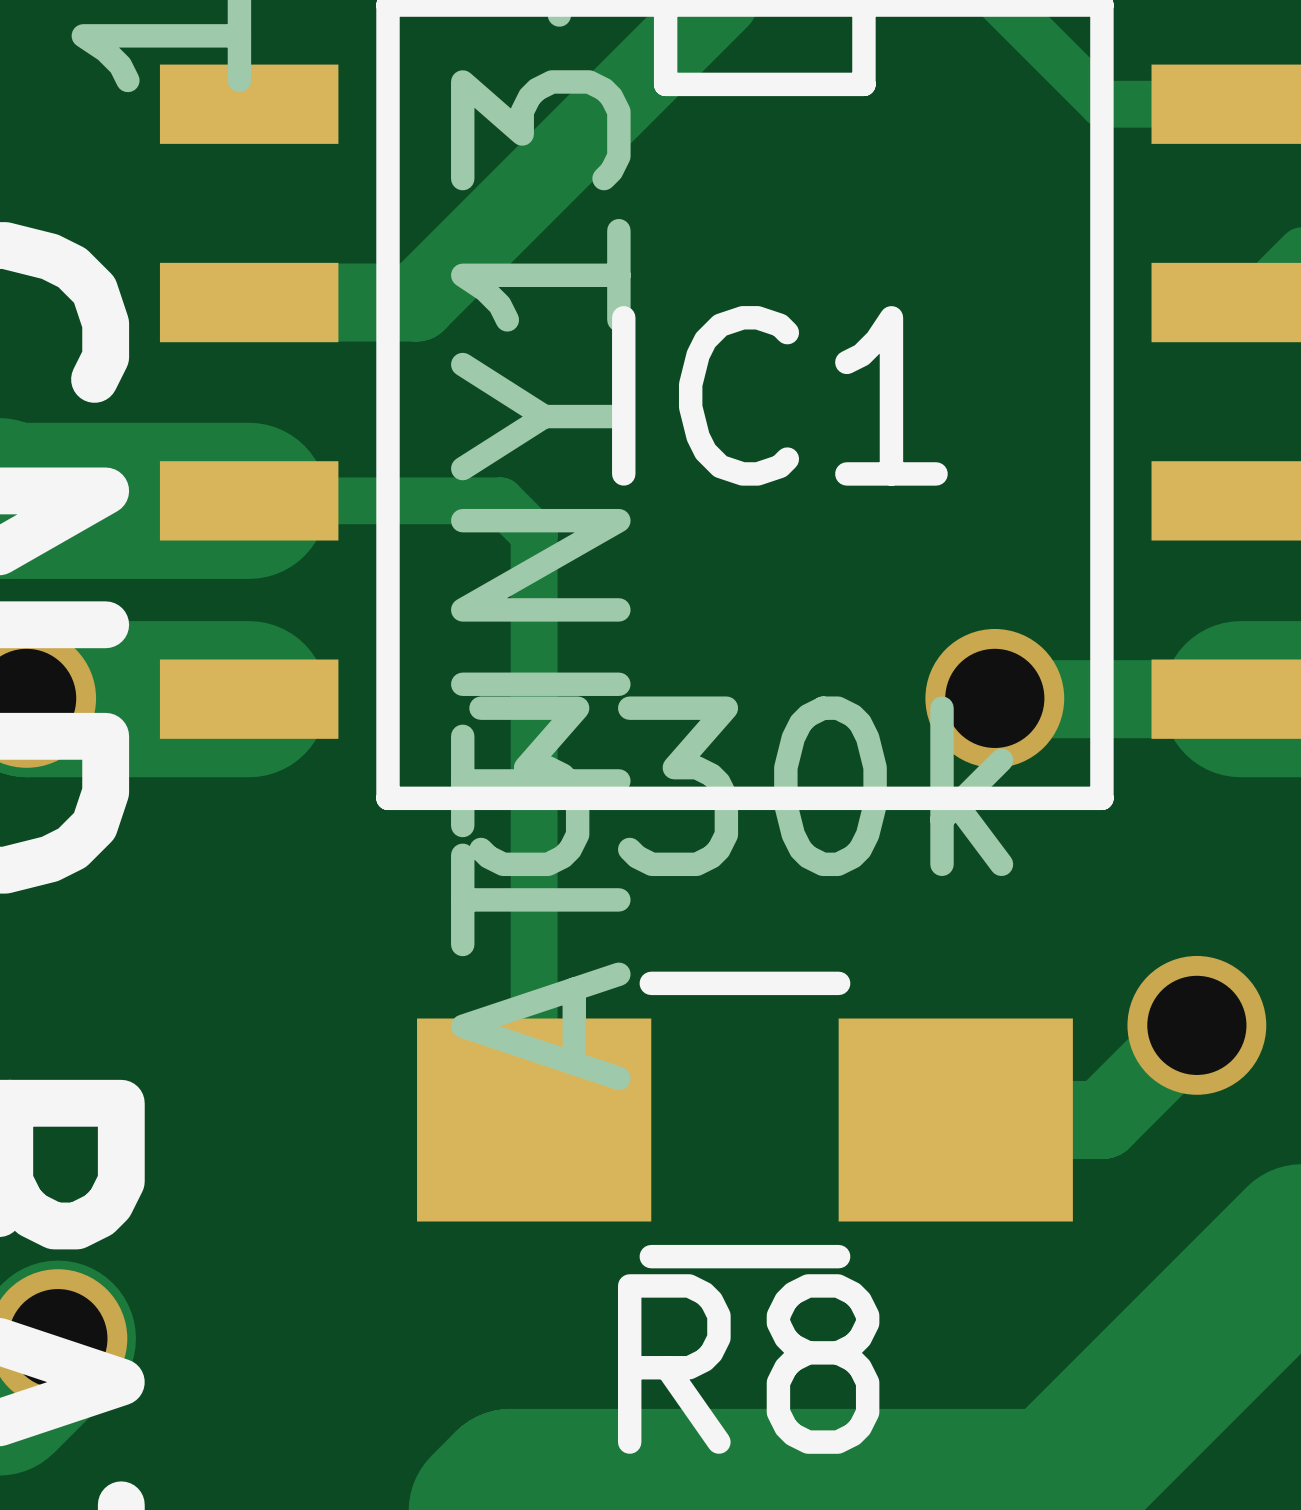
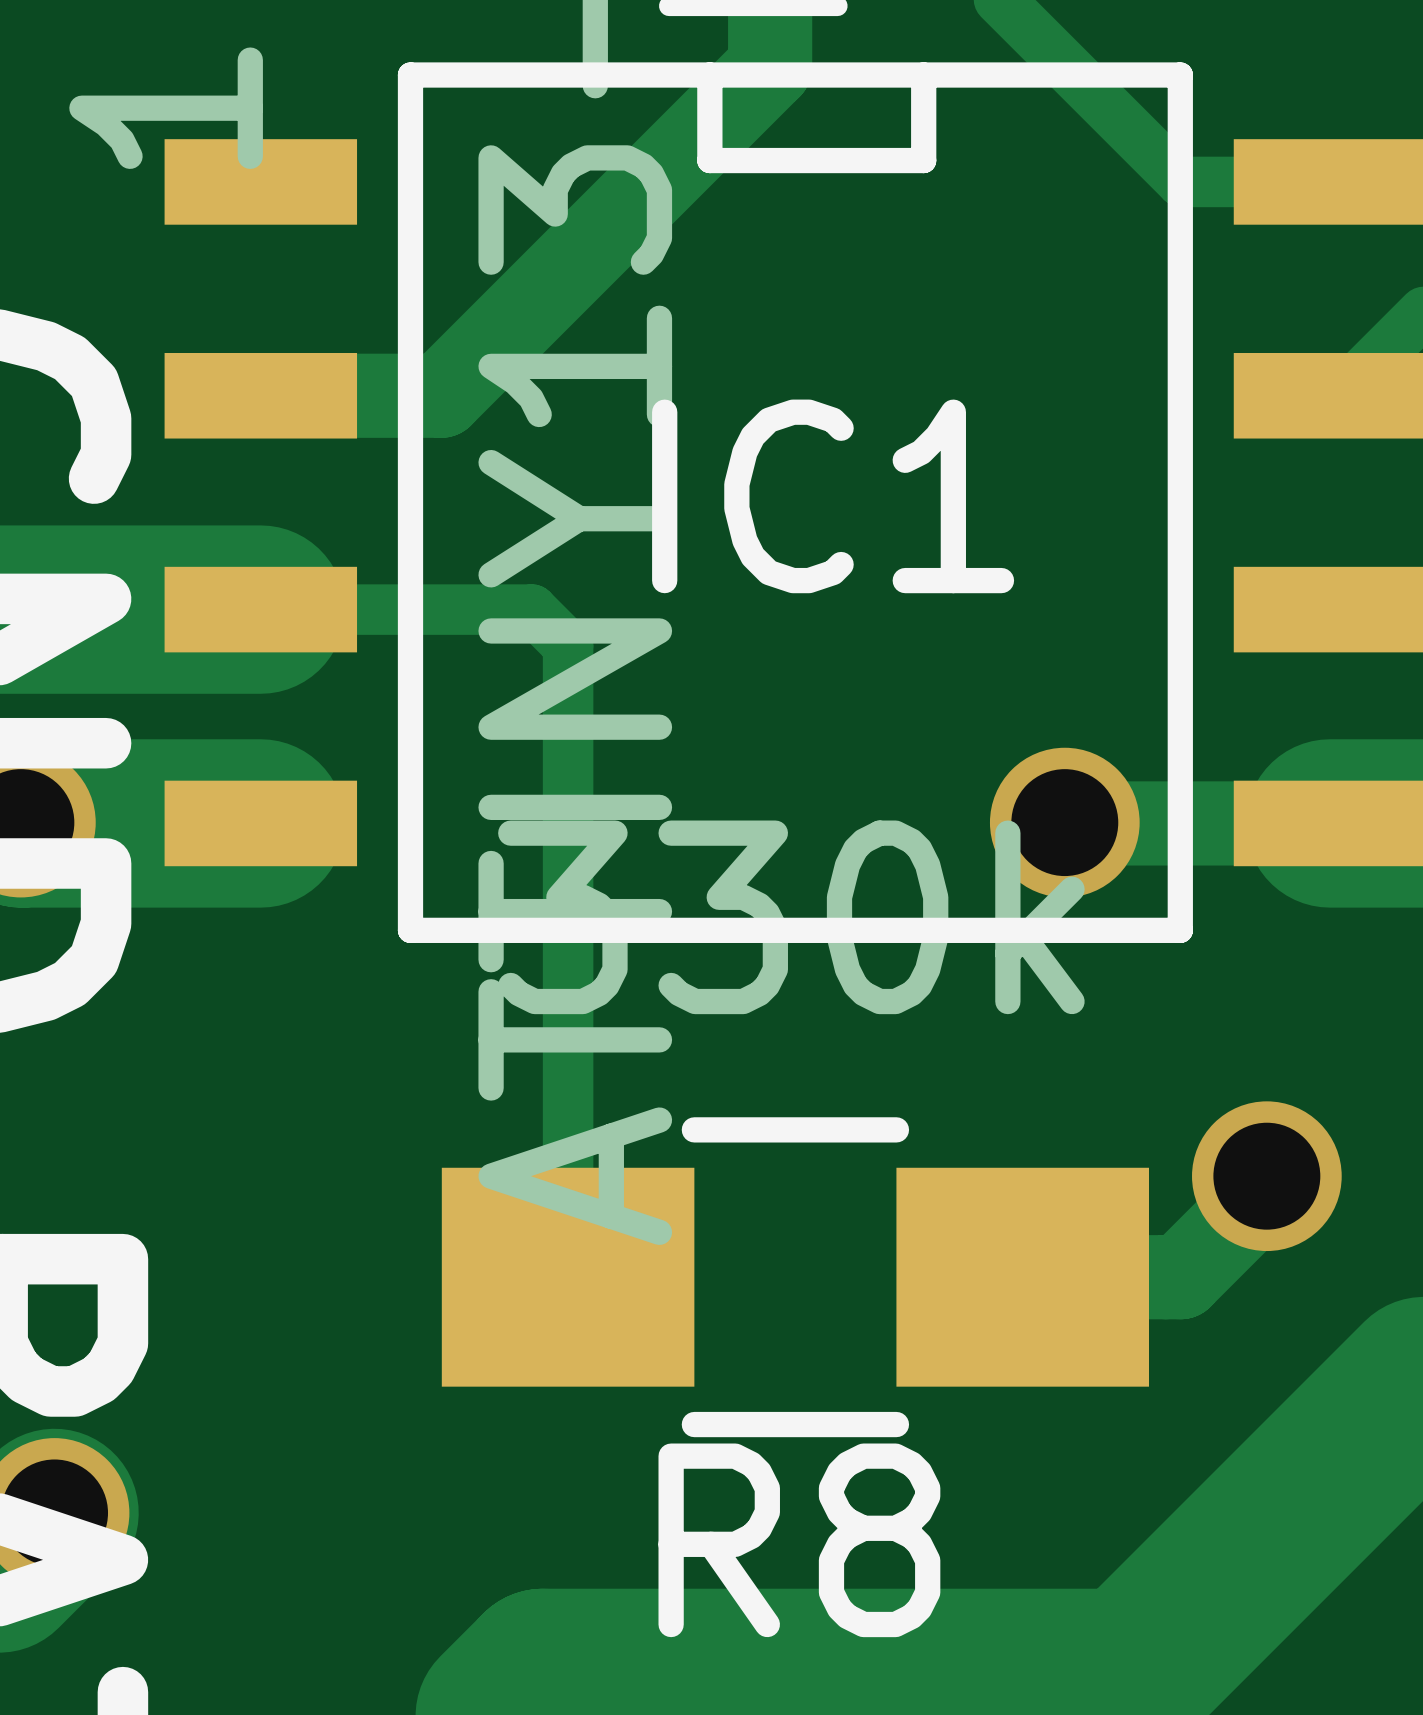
via position: (1196, 1025) -> (1266, 1176)

